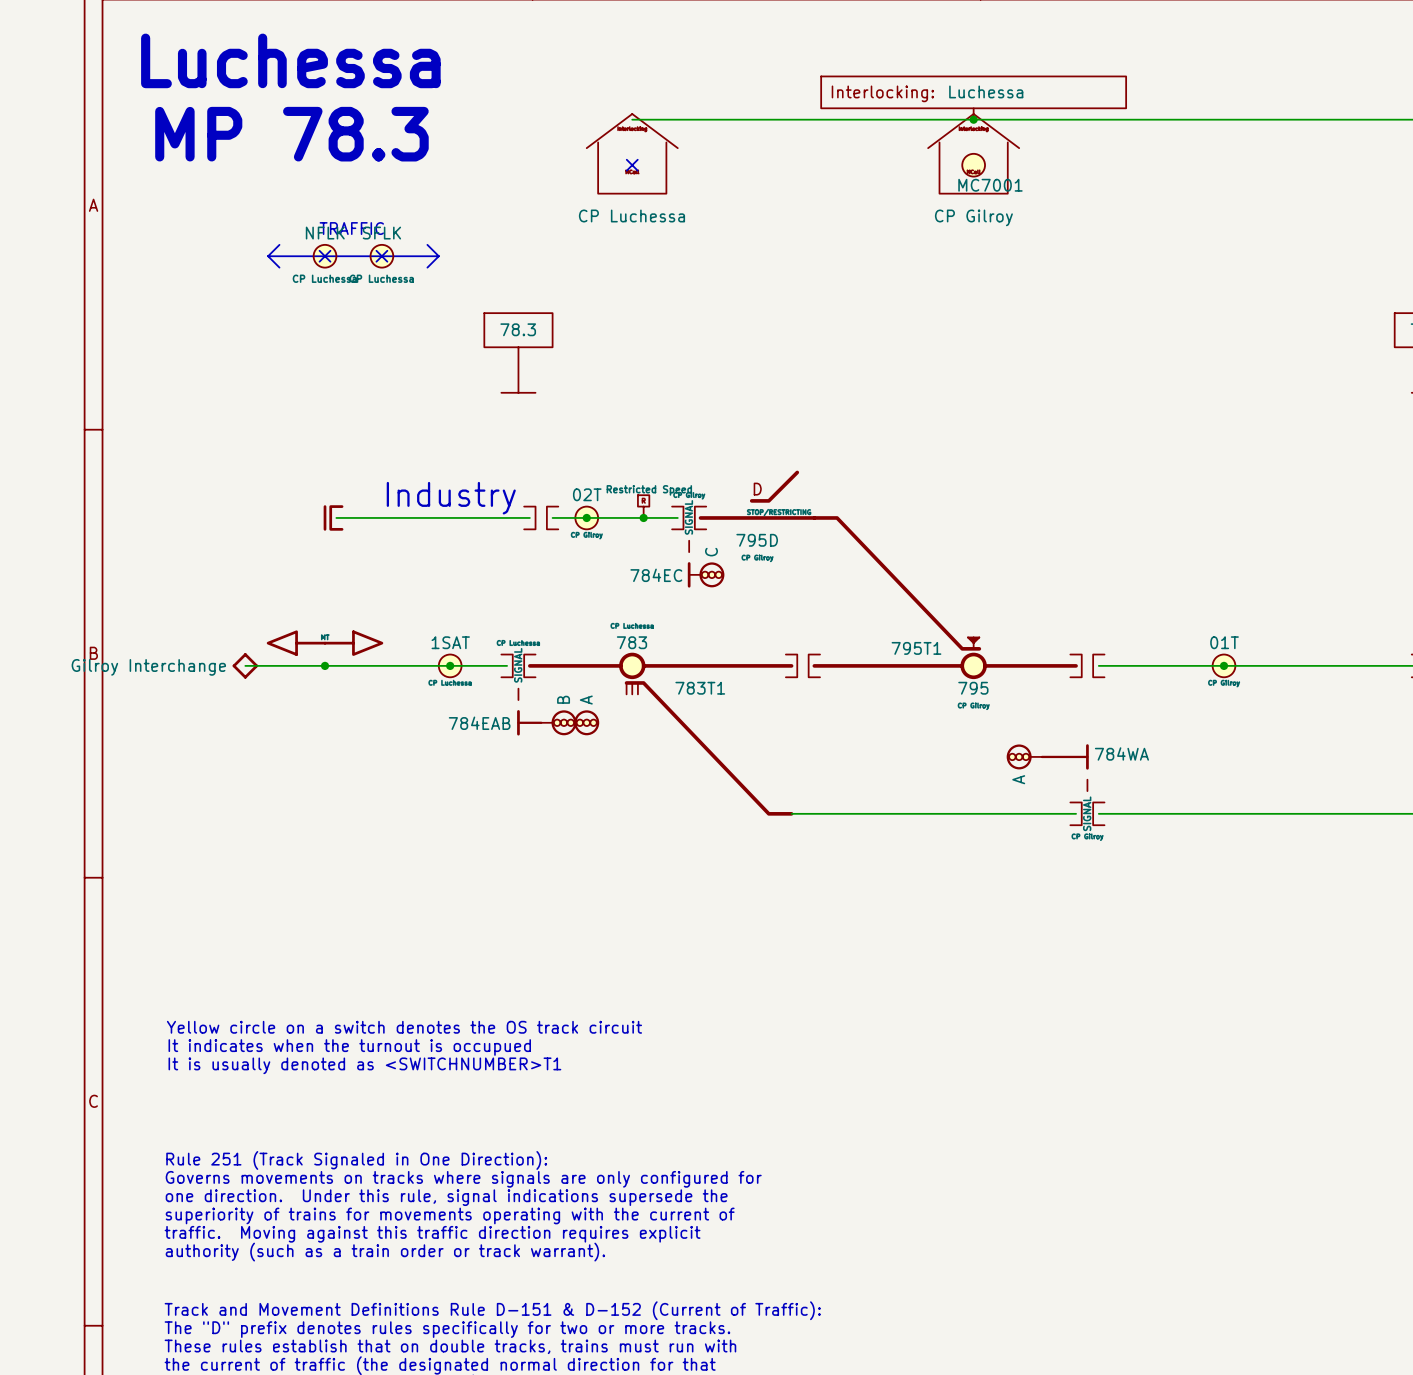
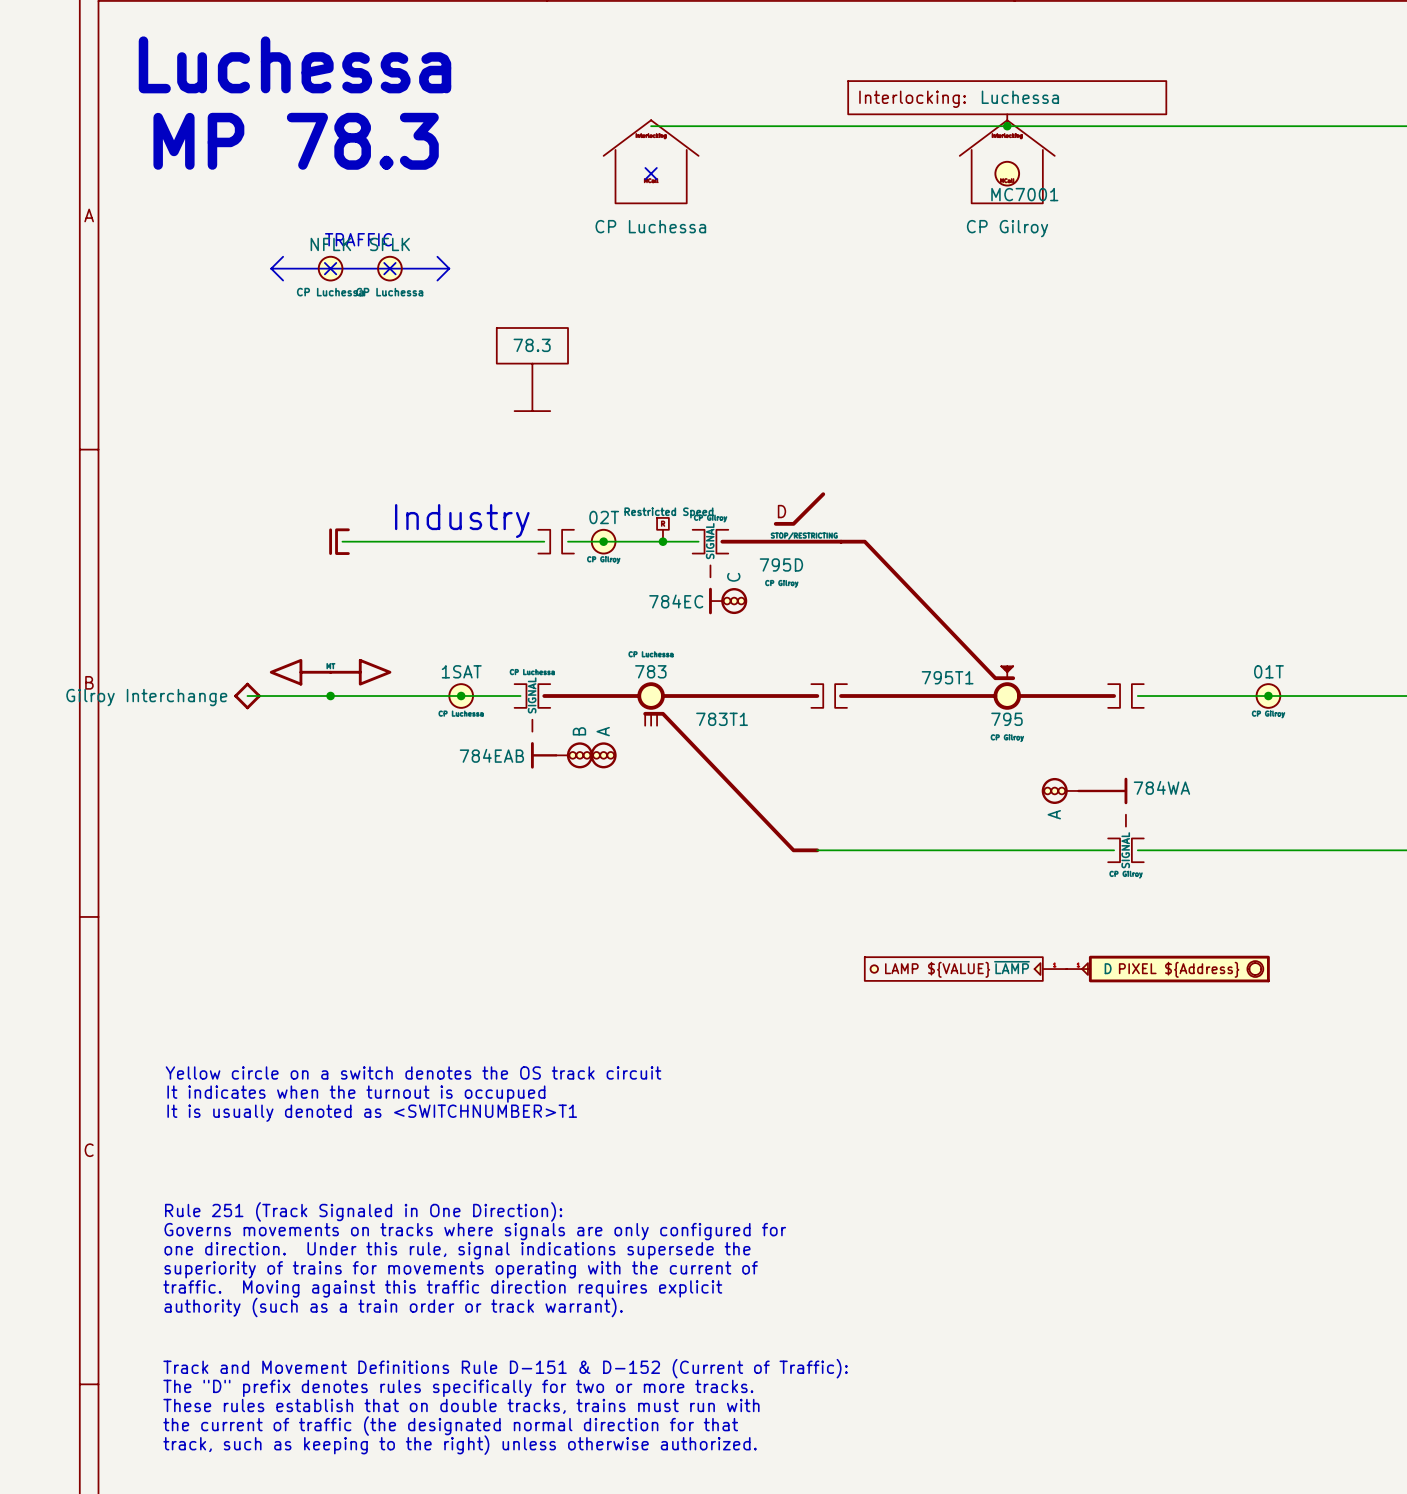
part: none -> (965, 969)
part: none -> (1168, 969)

